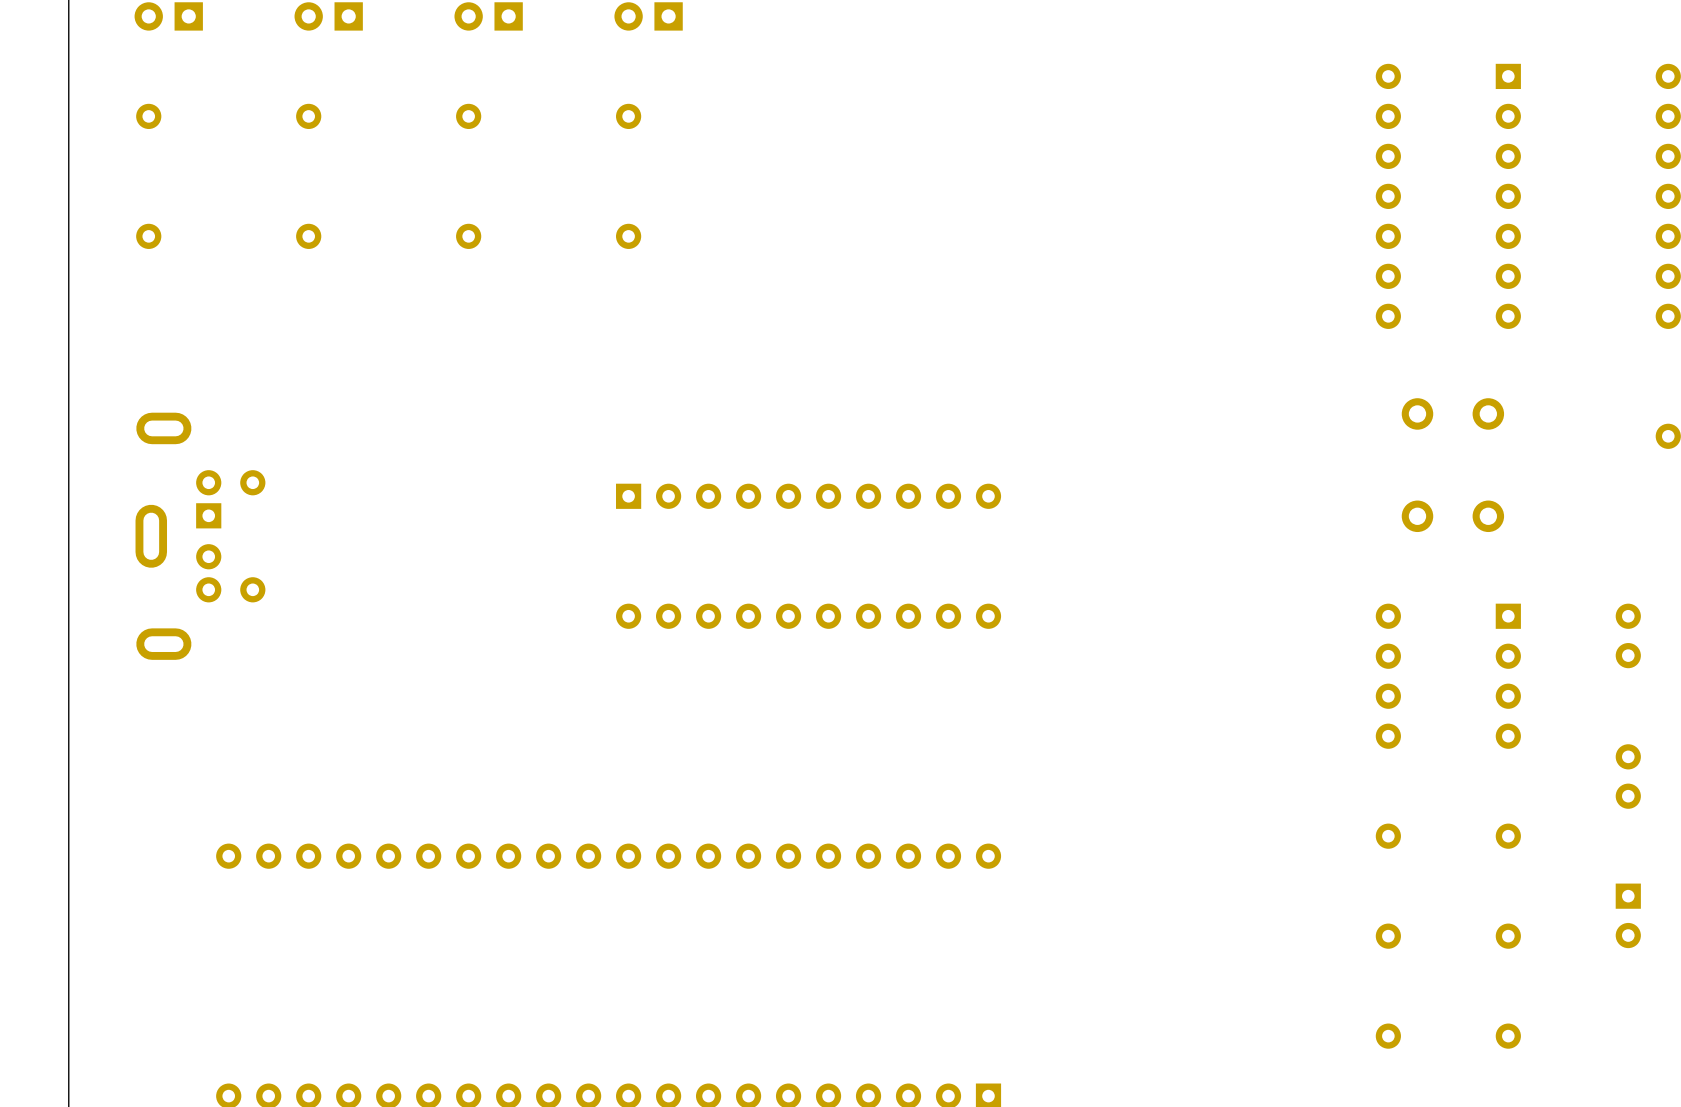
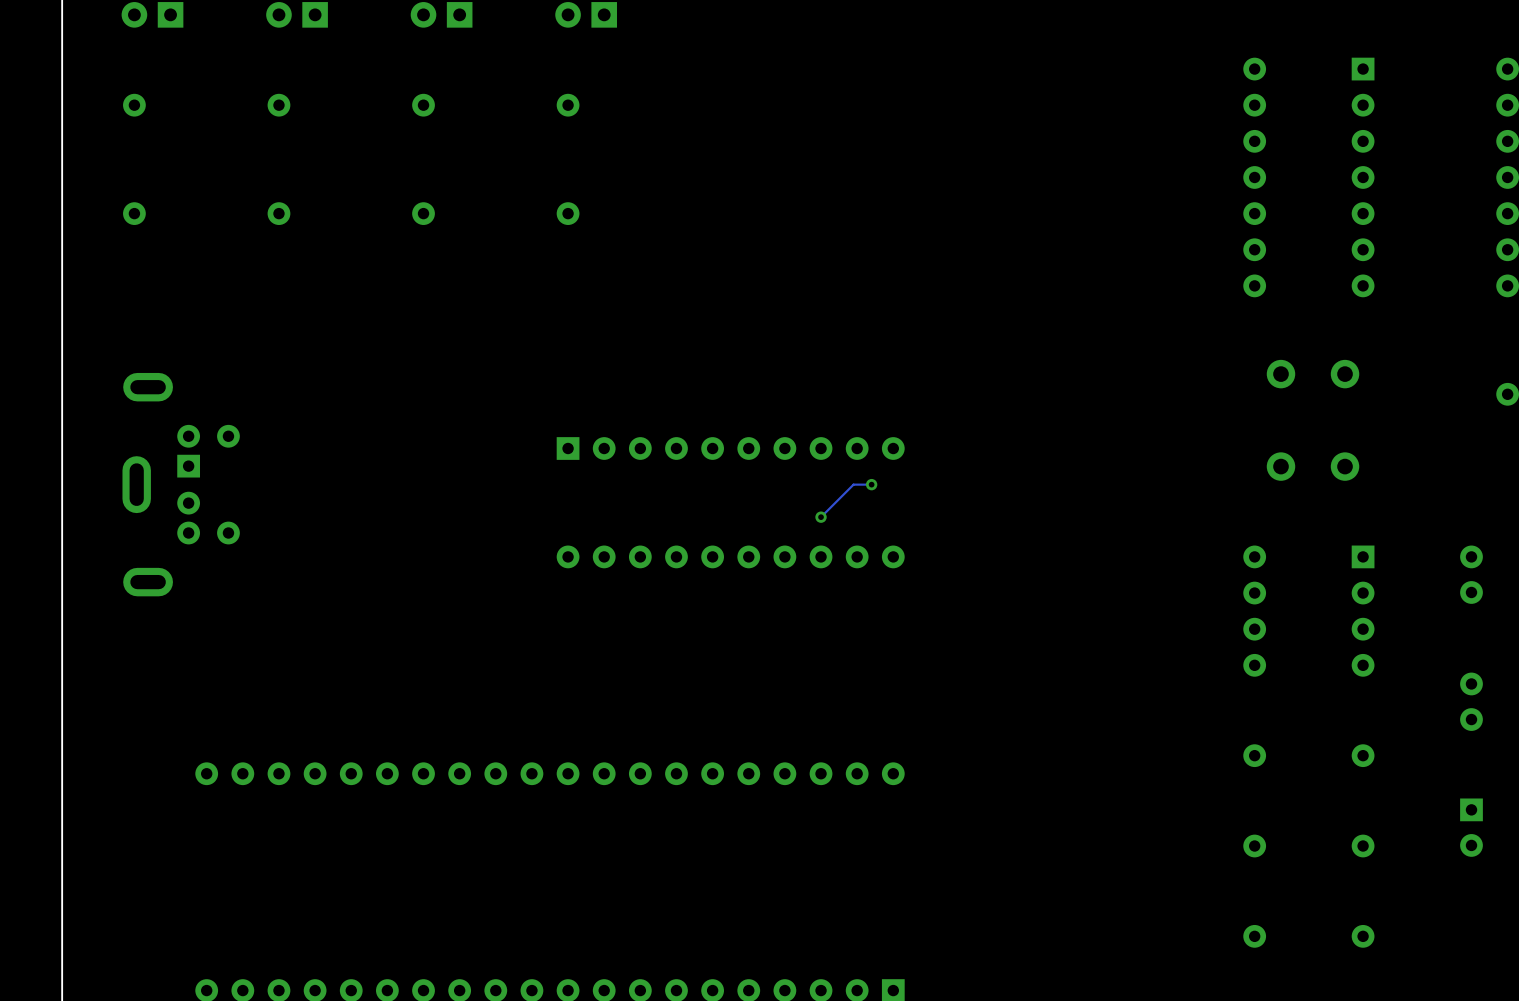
track: none -> (871, 484) (853, 484) (821, 517)
via: none -> (871, 484)
via: none -> (821, 517)

